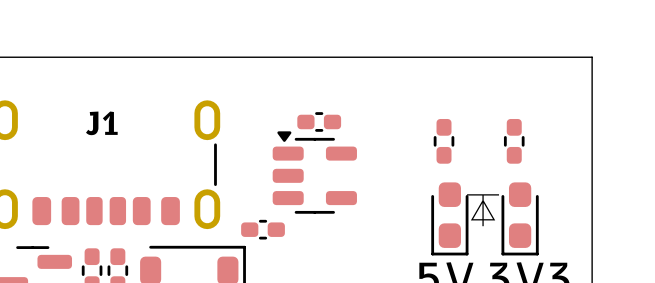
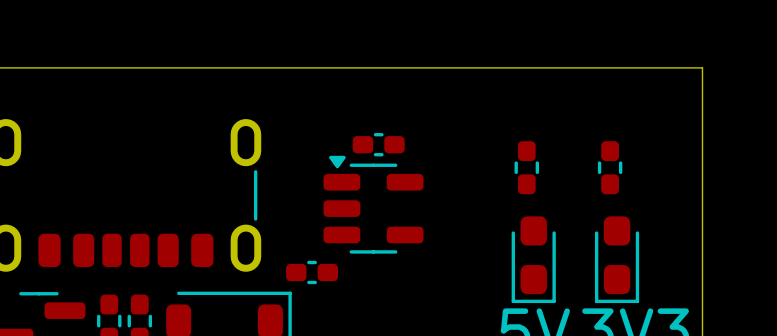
text: J1 (101, 123) -> none
text: ⏄ (483, 210) -> none

